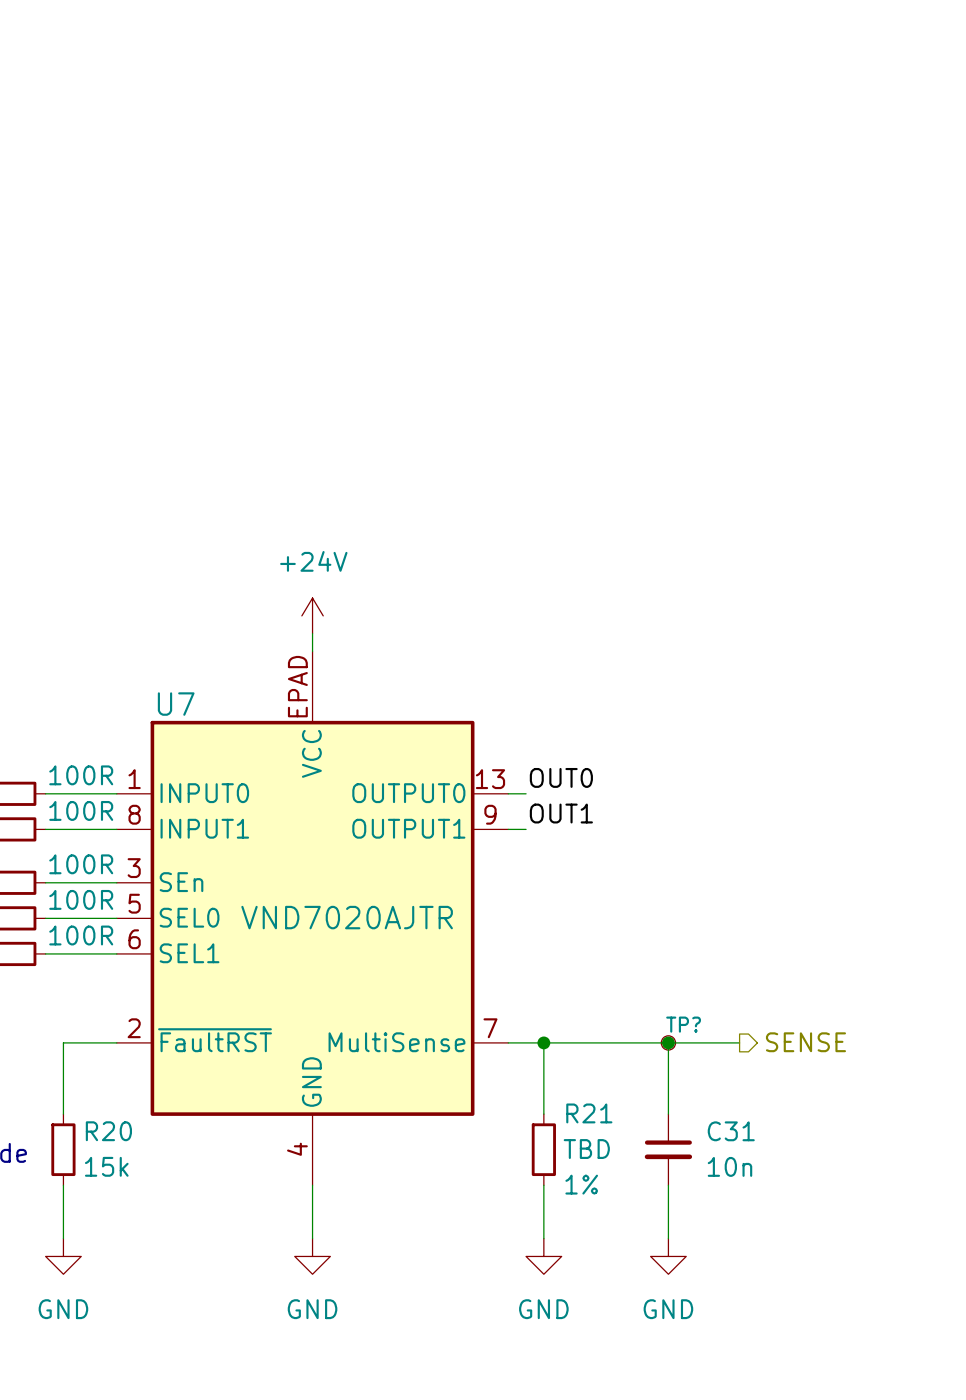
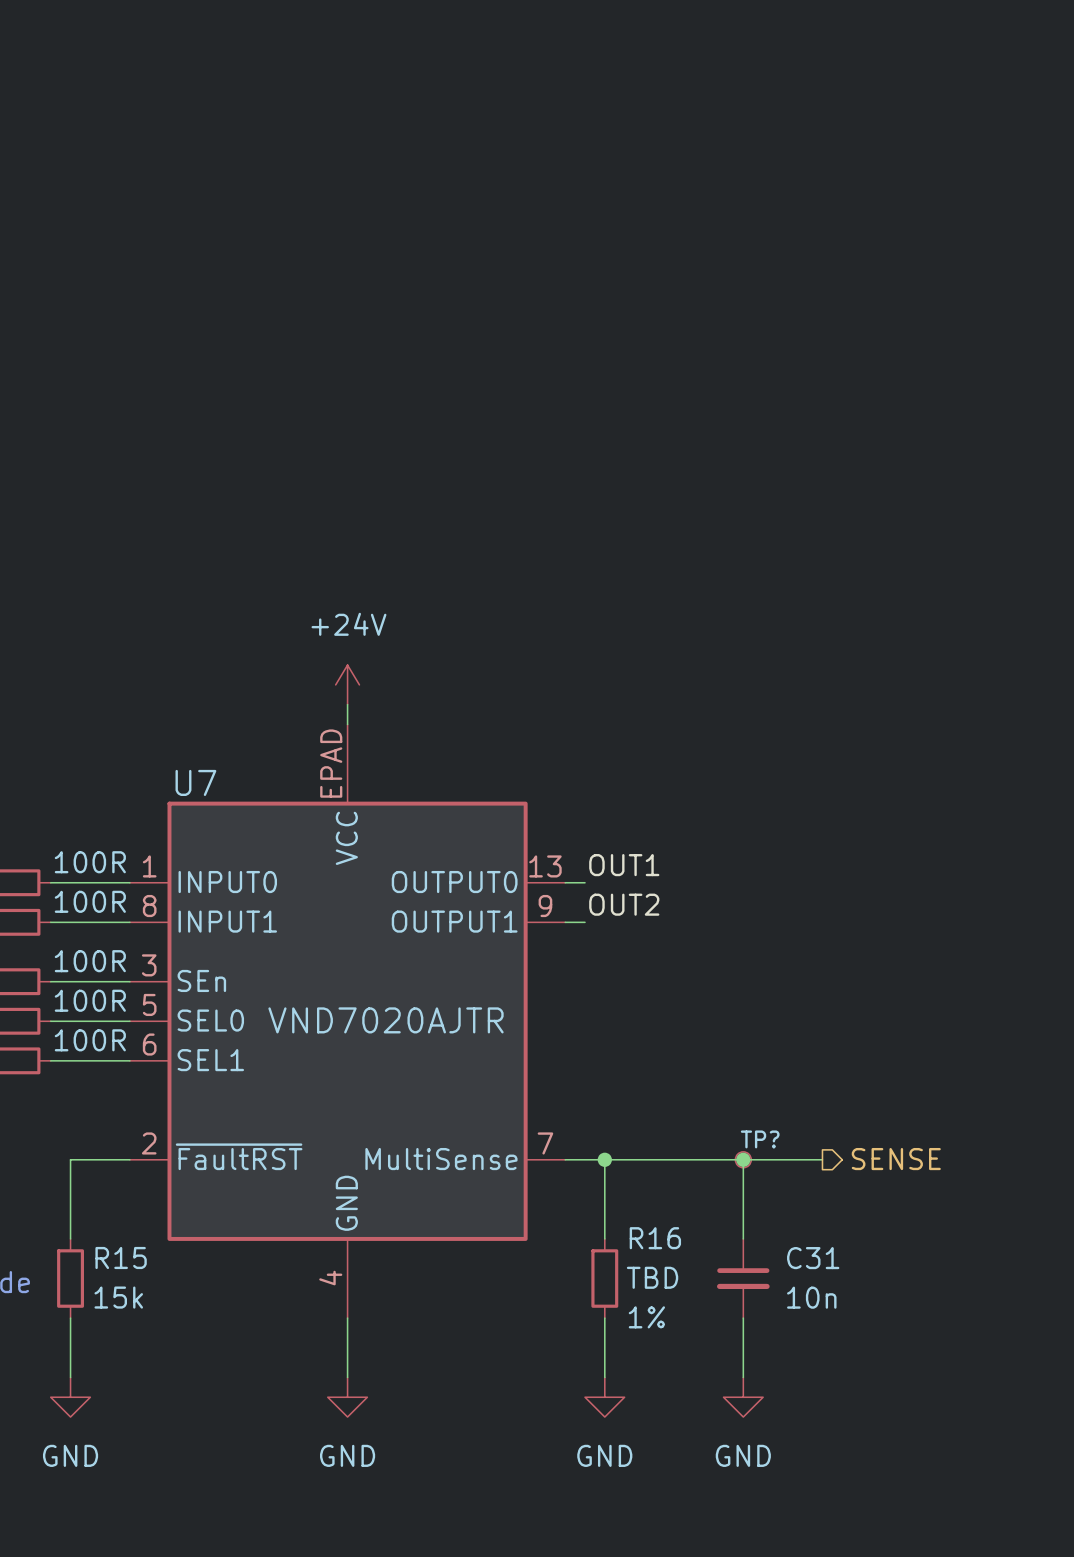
label: OUT0 (561, 777) -> OUT1 (624, 865)
label: OUT1 (561, 813) -> OUT2 (624, 904)
R21 name: R21 (589, 1113) -> R16 (655, 1238)
R20 name: R20 (108, 1131) -> R15 (121, 1257)

